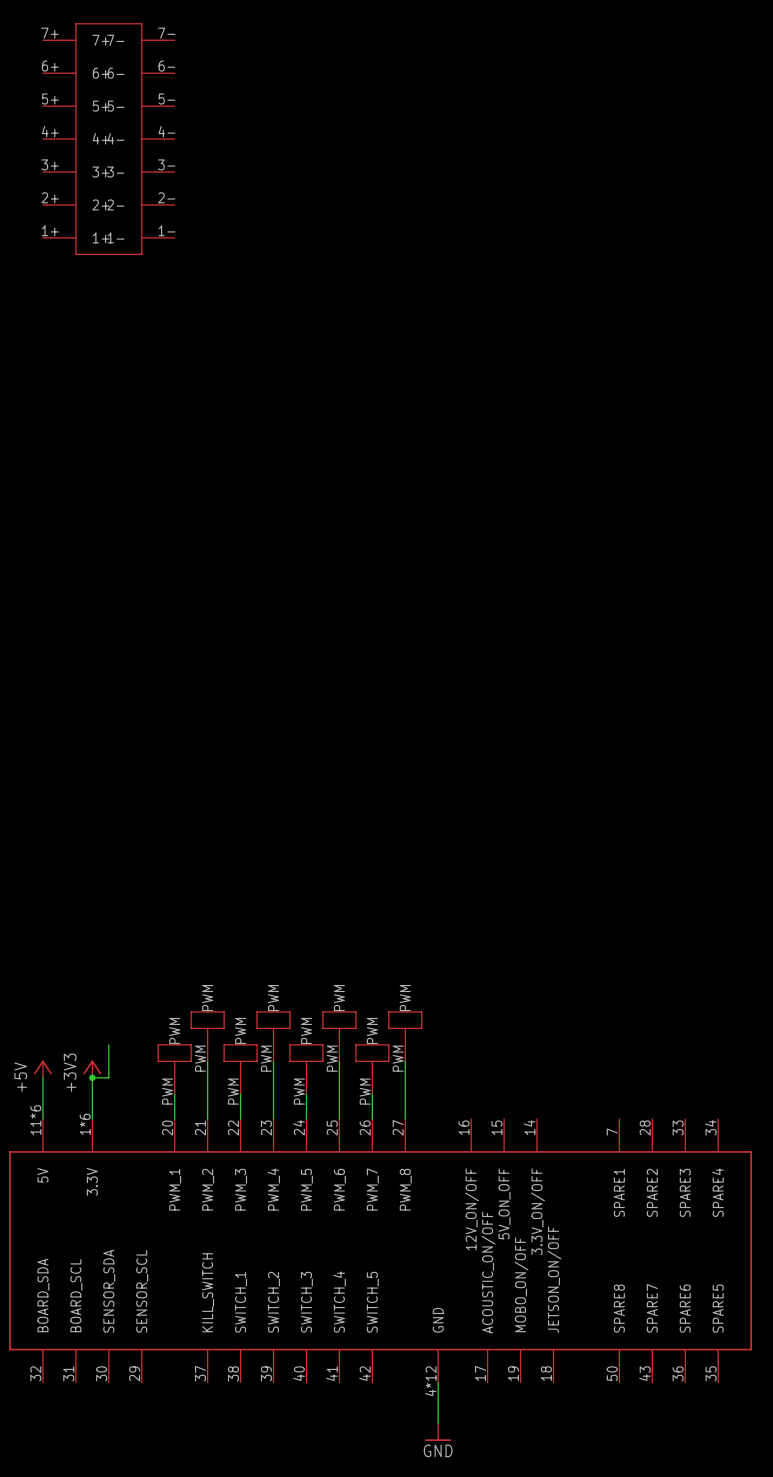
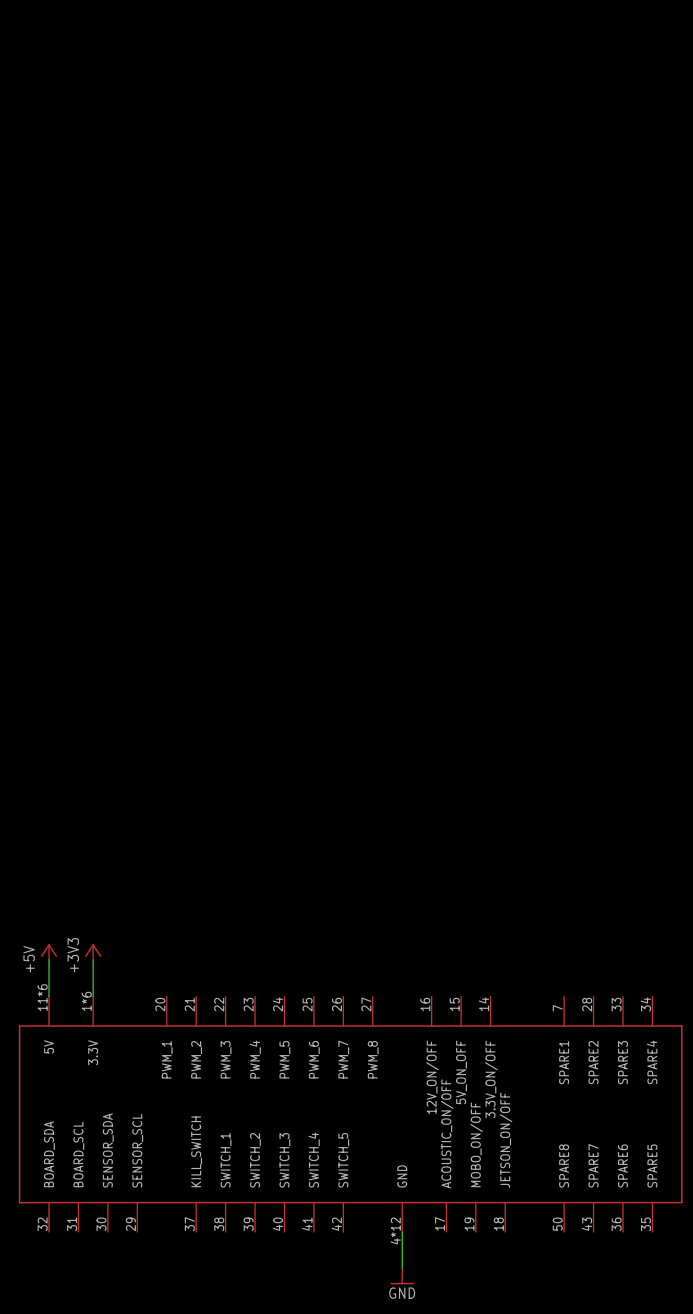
part: (108, 139) -> none
part: (207, 1036) -> none
part: (273, 1036) -> none
part: (339, 1036) -> none
part: (405, 1036) -> none
wire: (108, 1044) (108, 1077) (92, 1077) -> none
wire: (207, 1061) (207, 1118) -> none
wire: (273, 1061) (273, 1118) -> none
wire: (339, 1061) (339, 1118) -> none
wire: (405, 1061) (405, 1118) -> none
part: (174, 1069) -> none
part: (240, 1069) -> none
part: (306, 1069) -> none
part: (372, 1069) -> none
junction: (92, 1077) -> none
wire: (174, 1094) (174, 1118) -> none
wire: (240, 1094) (240, 1118) -> none
wire: (306, 1094) (306, 1118) -> none
wire: (372, 1094) (372, 1118) -> none

